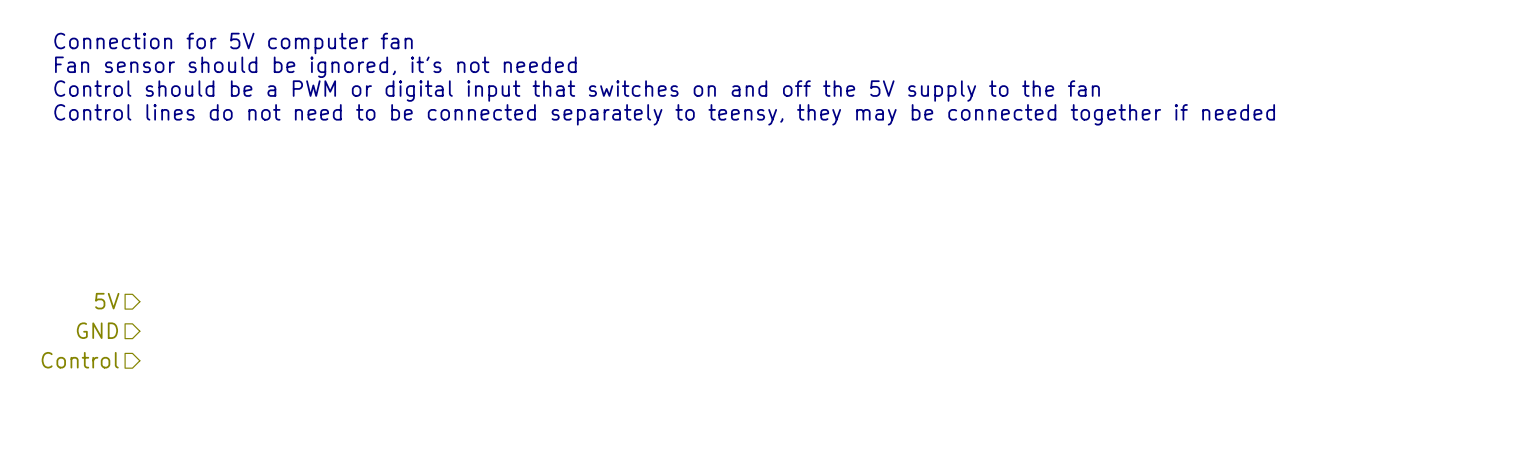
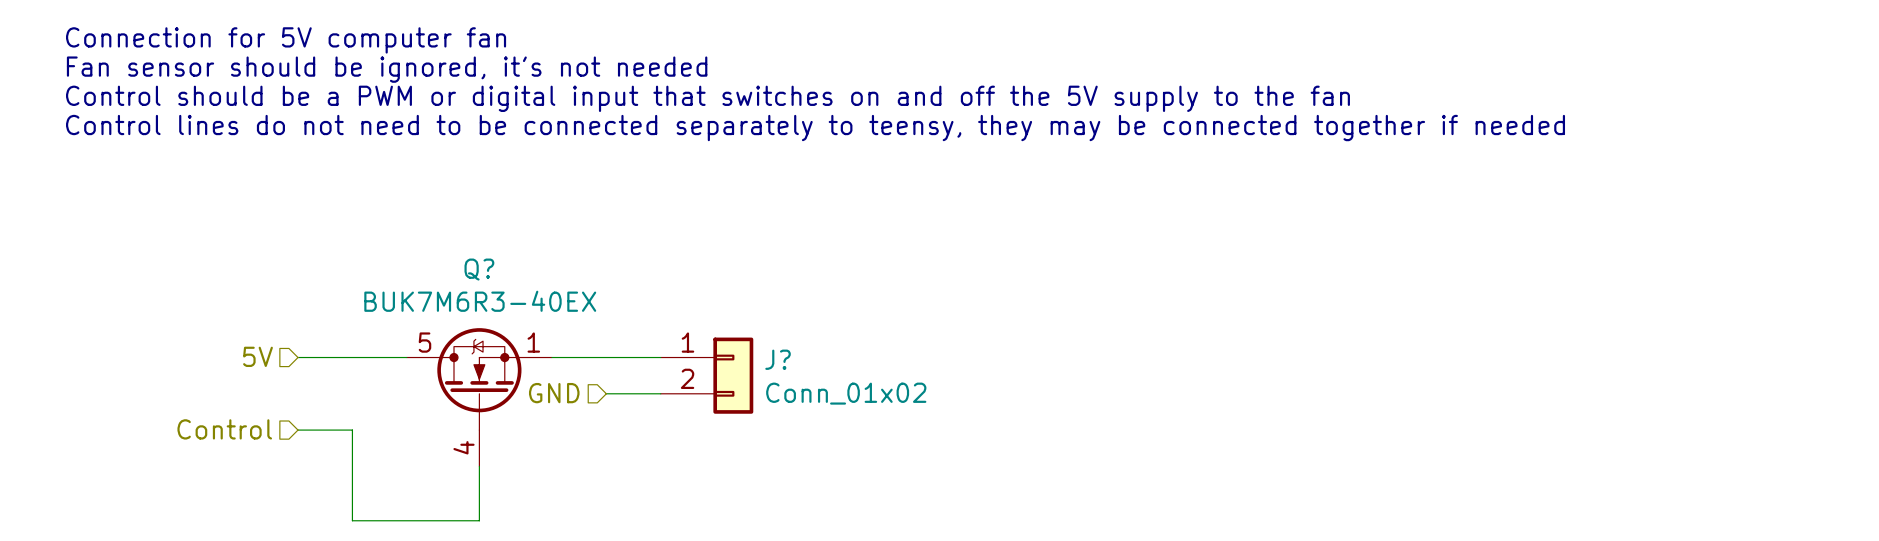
hierarchical label position: 5V (107, 301) -> 5V (257, 356)
wire: none -> (298, 357) (406, 357)
wire: none -> (551, 357) (660, 357)
J?: none -> Conn_01x02 (707, 375)
hierarchical label: GND (97, 330) -> none
hierarchical label: none -> GND (554, 393)
wire: none -> (606, 393) (660, 393)
Q?: none -> BUK7M6R3-40EX (479, 397)
hierarchical label position: Control (80, 360) -> Control (224, 429)
wire: none -> (298, 430) (352, 430) (352, 520) (479, 520) (479, 466)

